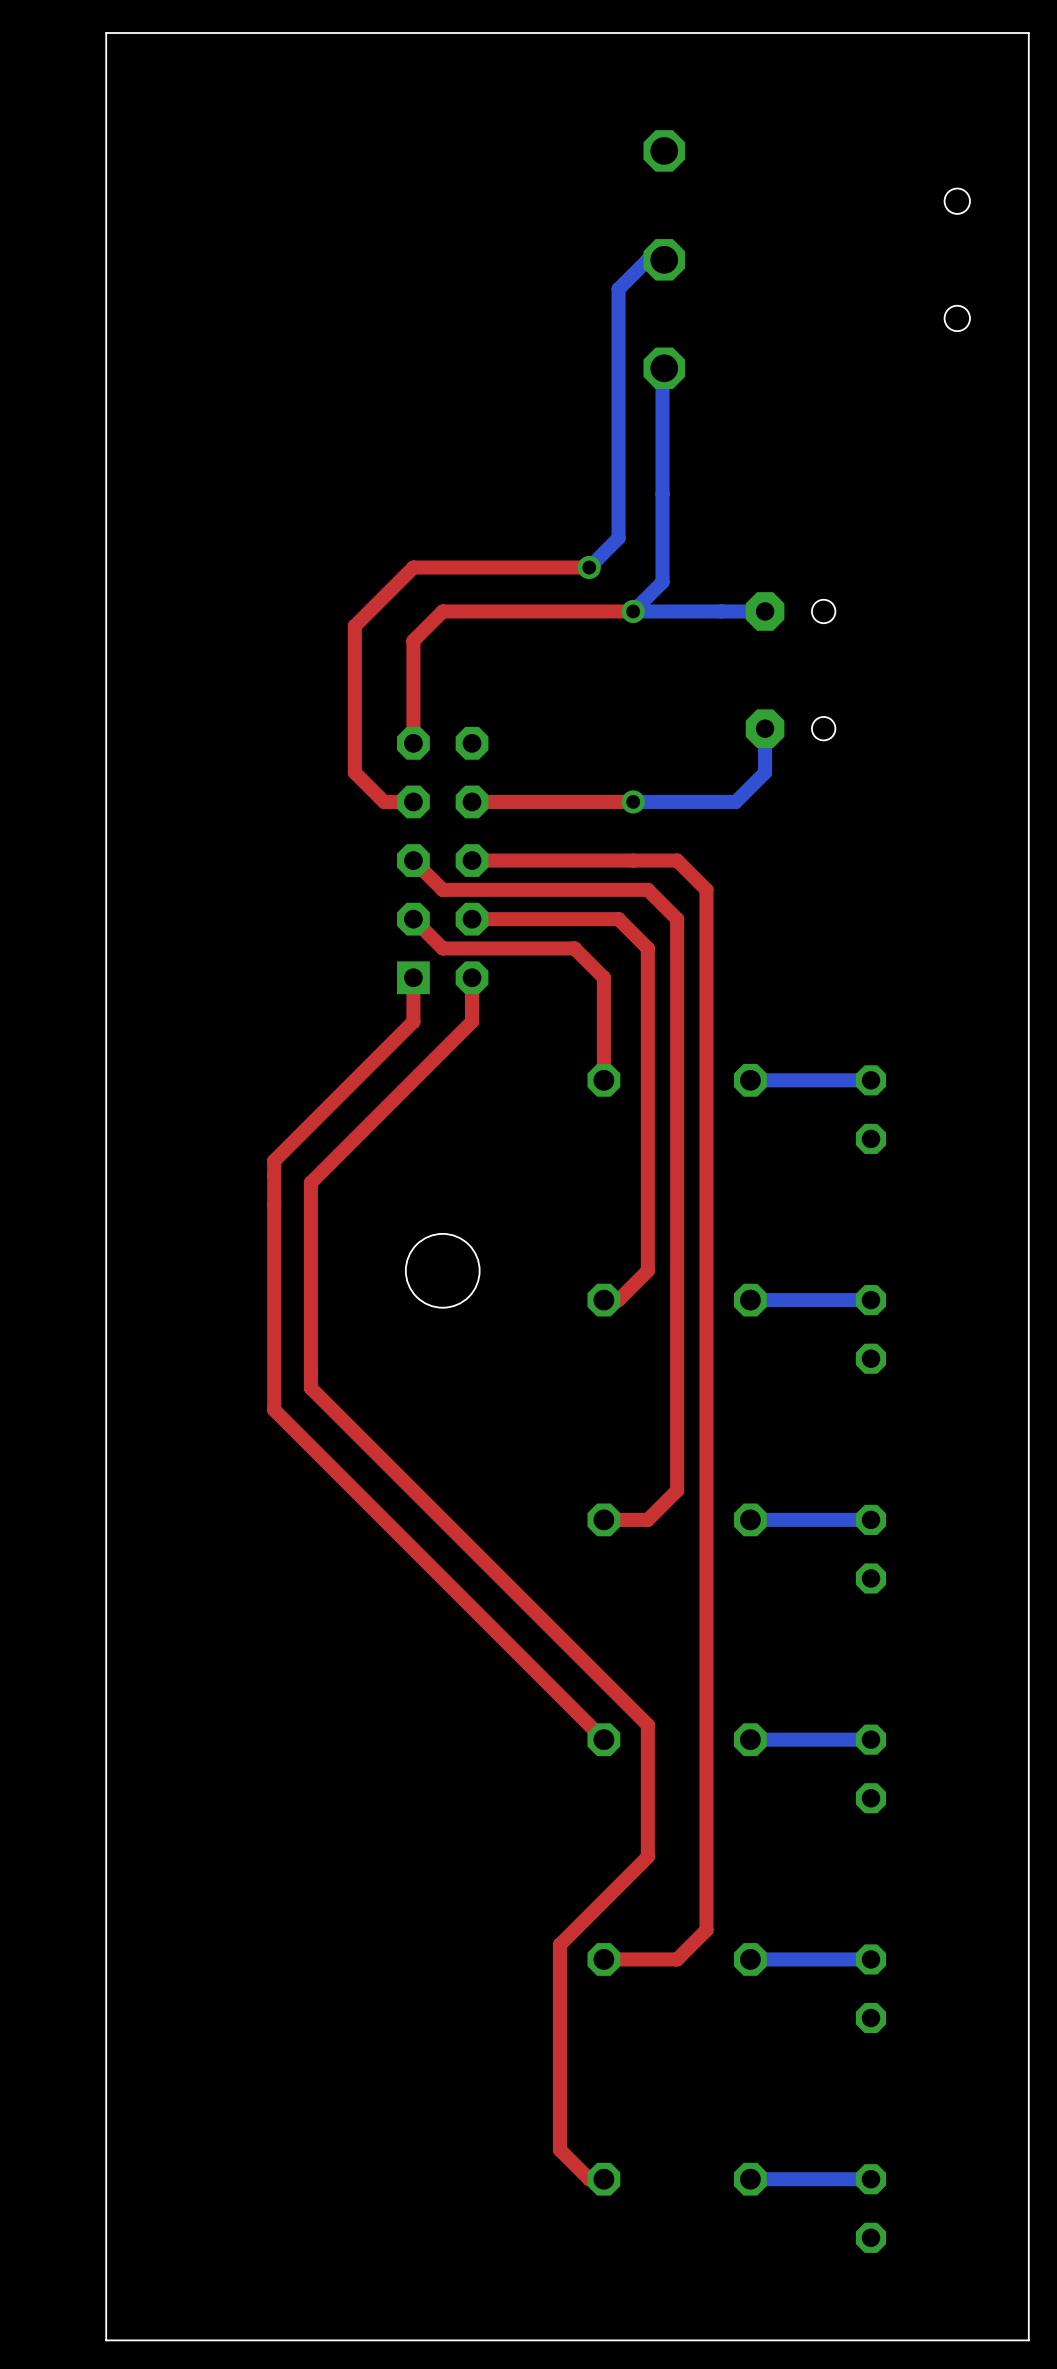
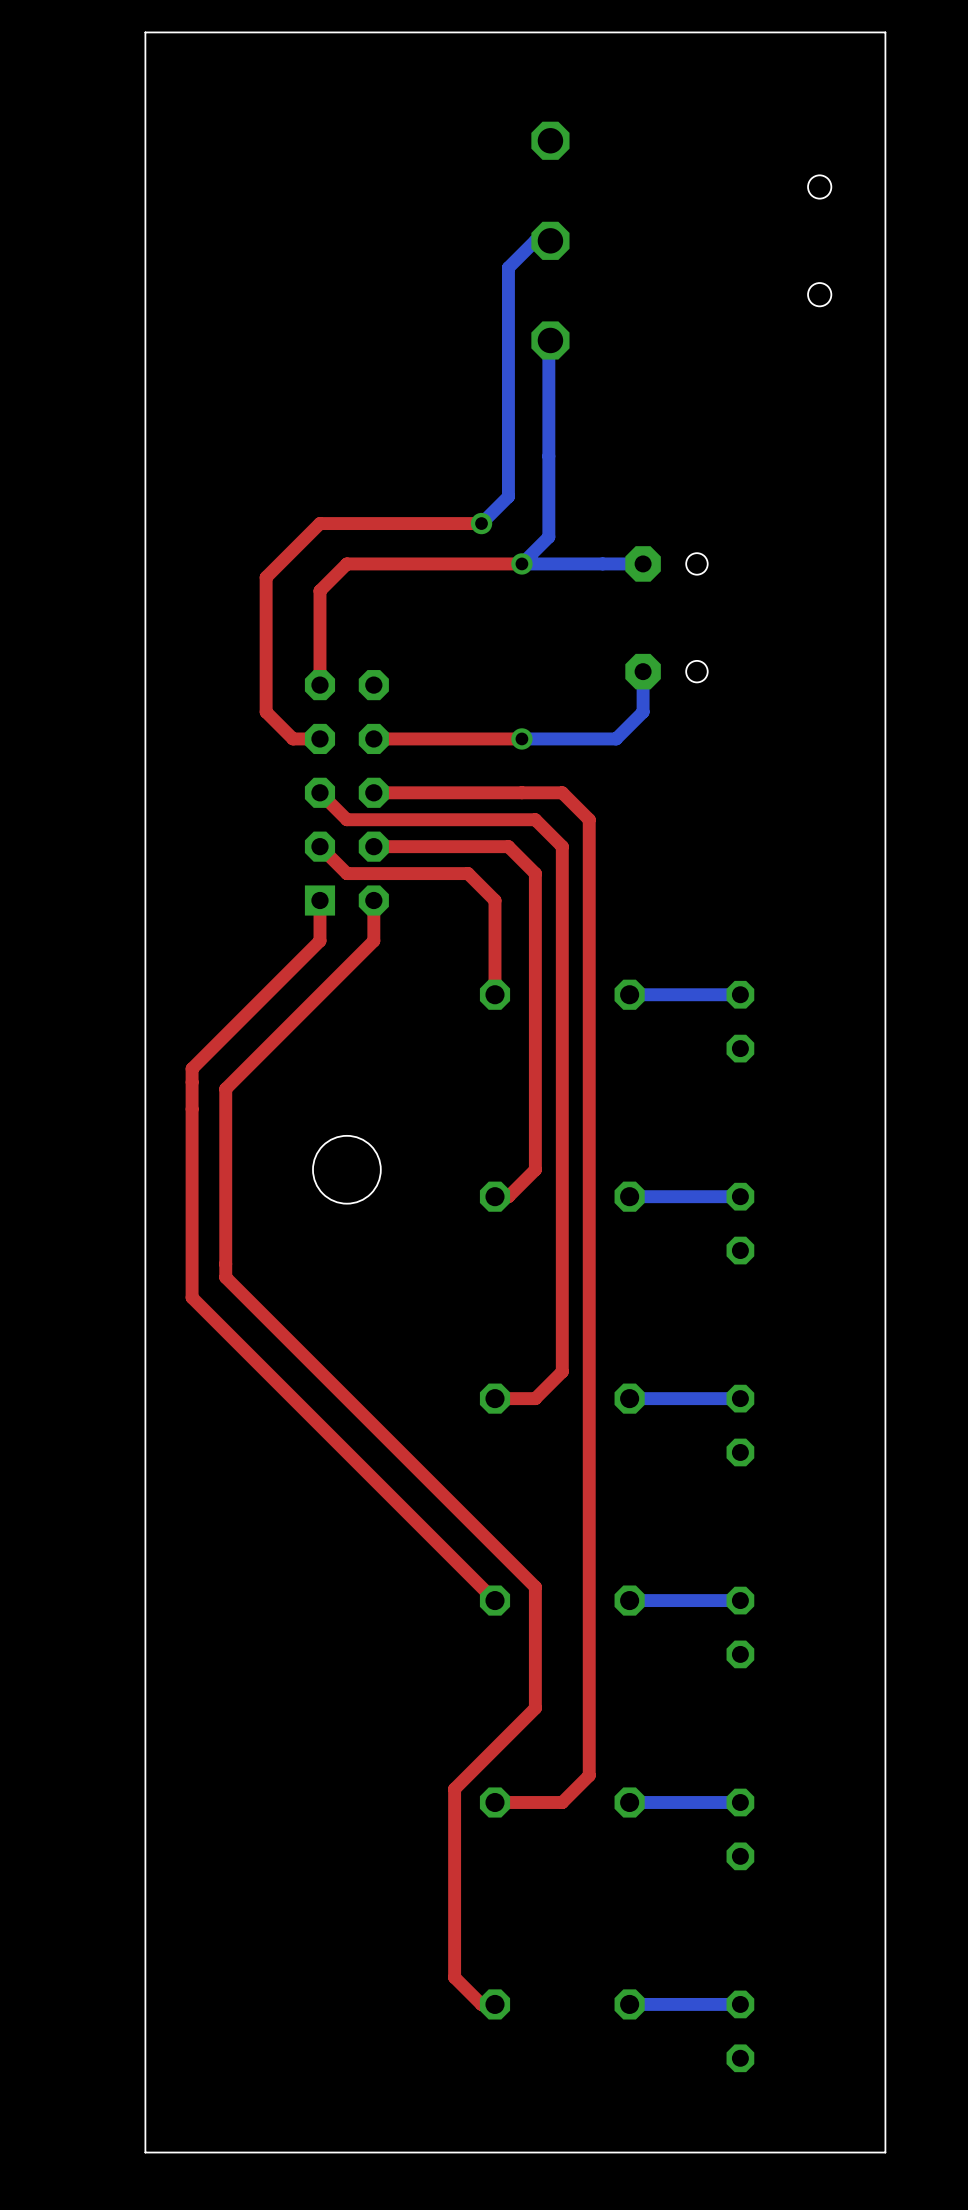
board edge: (223, 33) (106, 33) (106, 2340) (223, 2340) -> (145, 32) (145, 2152)

